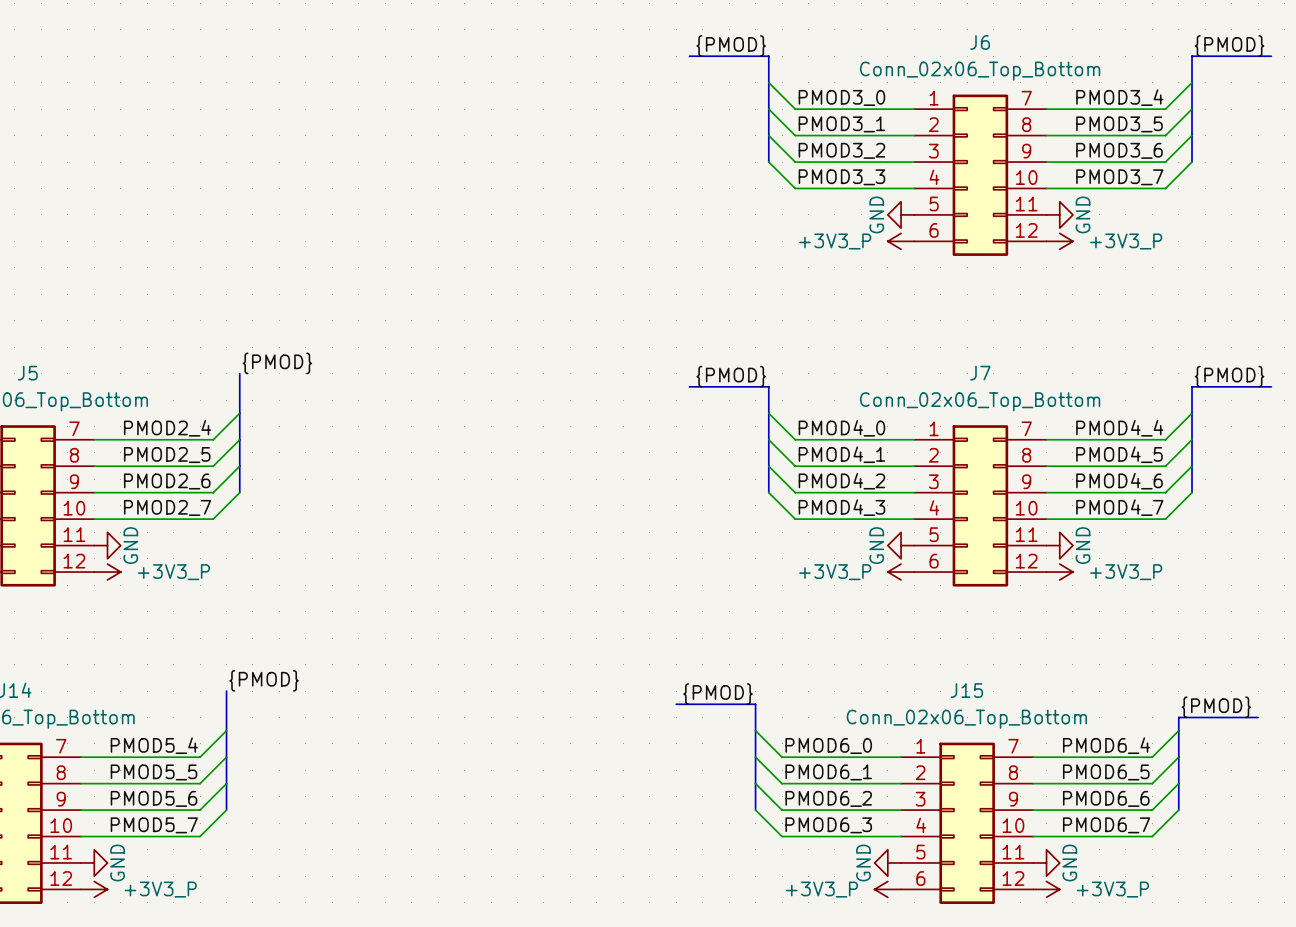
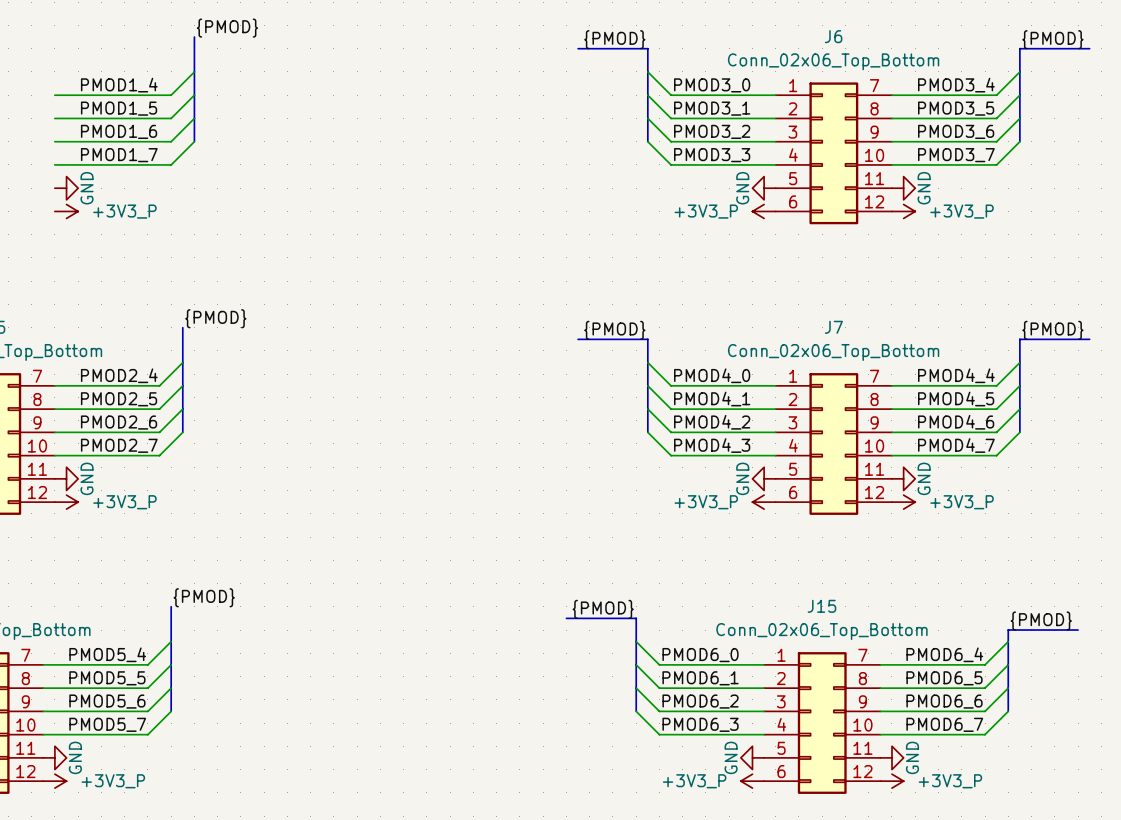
label: none -> {PMOD} (227, 28)
bus: none -> (194, 37) (194, 141)
wire: none -> (194, 71) (171, 95) (54, 95)
label: none -> PMOD1_4 (119, 85)
wire: none -> (194, 95) (171, 118) (54, 118)
label: none -> PMOD1_5 (119, 108)
wire: none -> (194, 118) (171, 141) (54, 141)
label: none -> PMOD1_6 (119, 131)
wire: none -> (194, 141) (171, 164) (54, 164)
label: none -> PMOD1_7 (119, 155)
power symbol: none -> GND (66, 188)
power symbol: none -> +3V3_P (66, 211)

